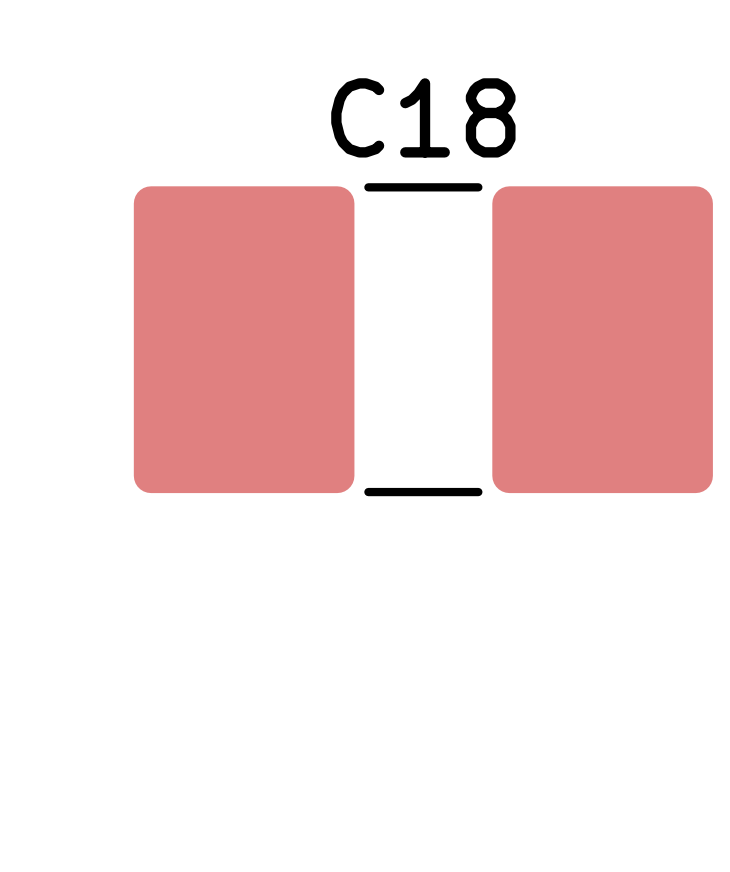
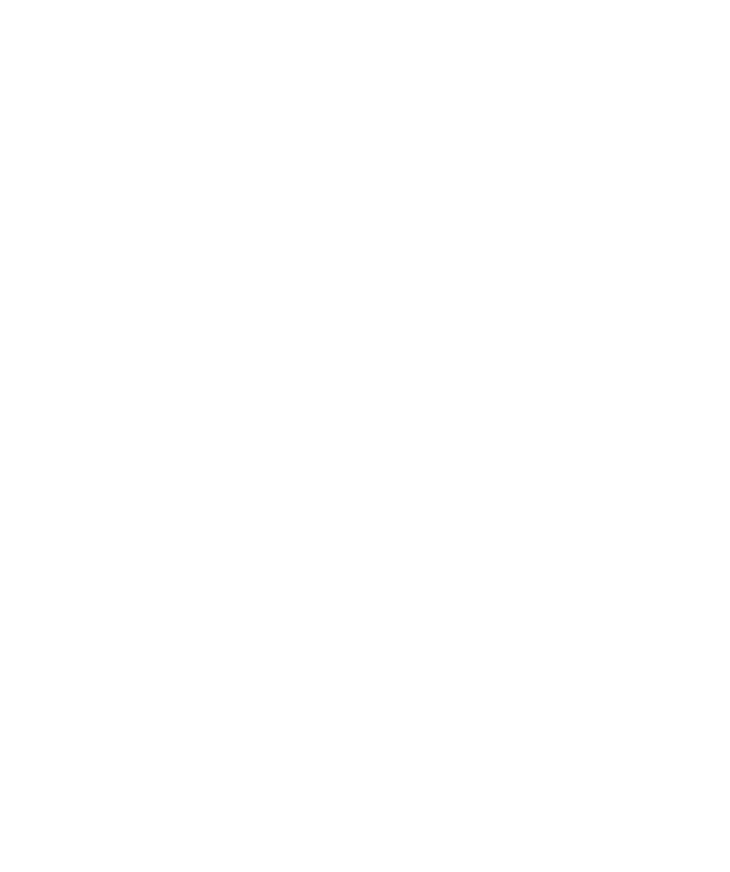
C18: (423, 339) -> none

